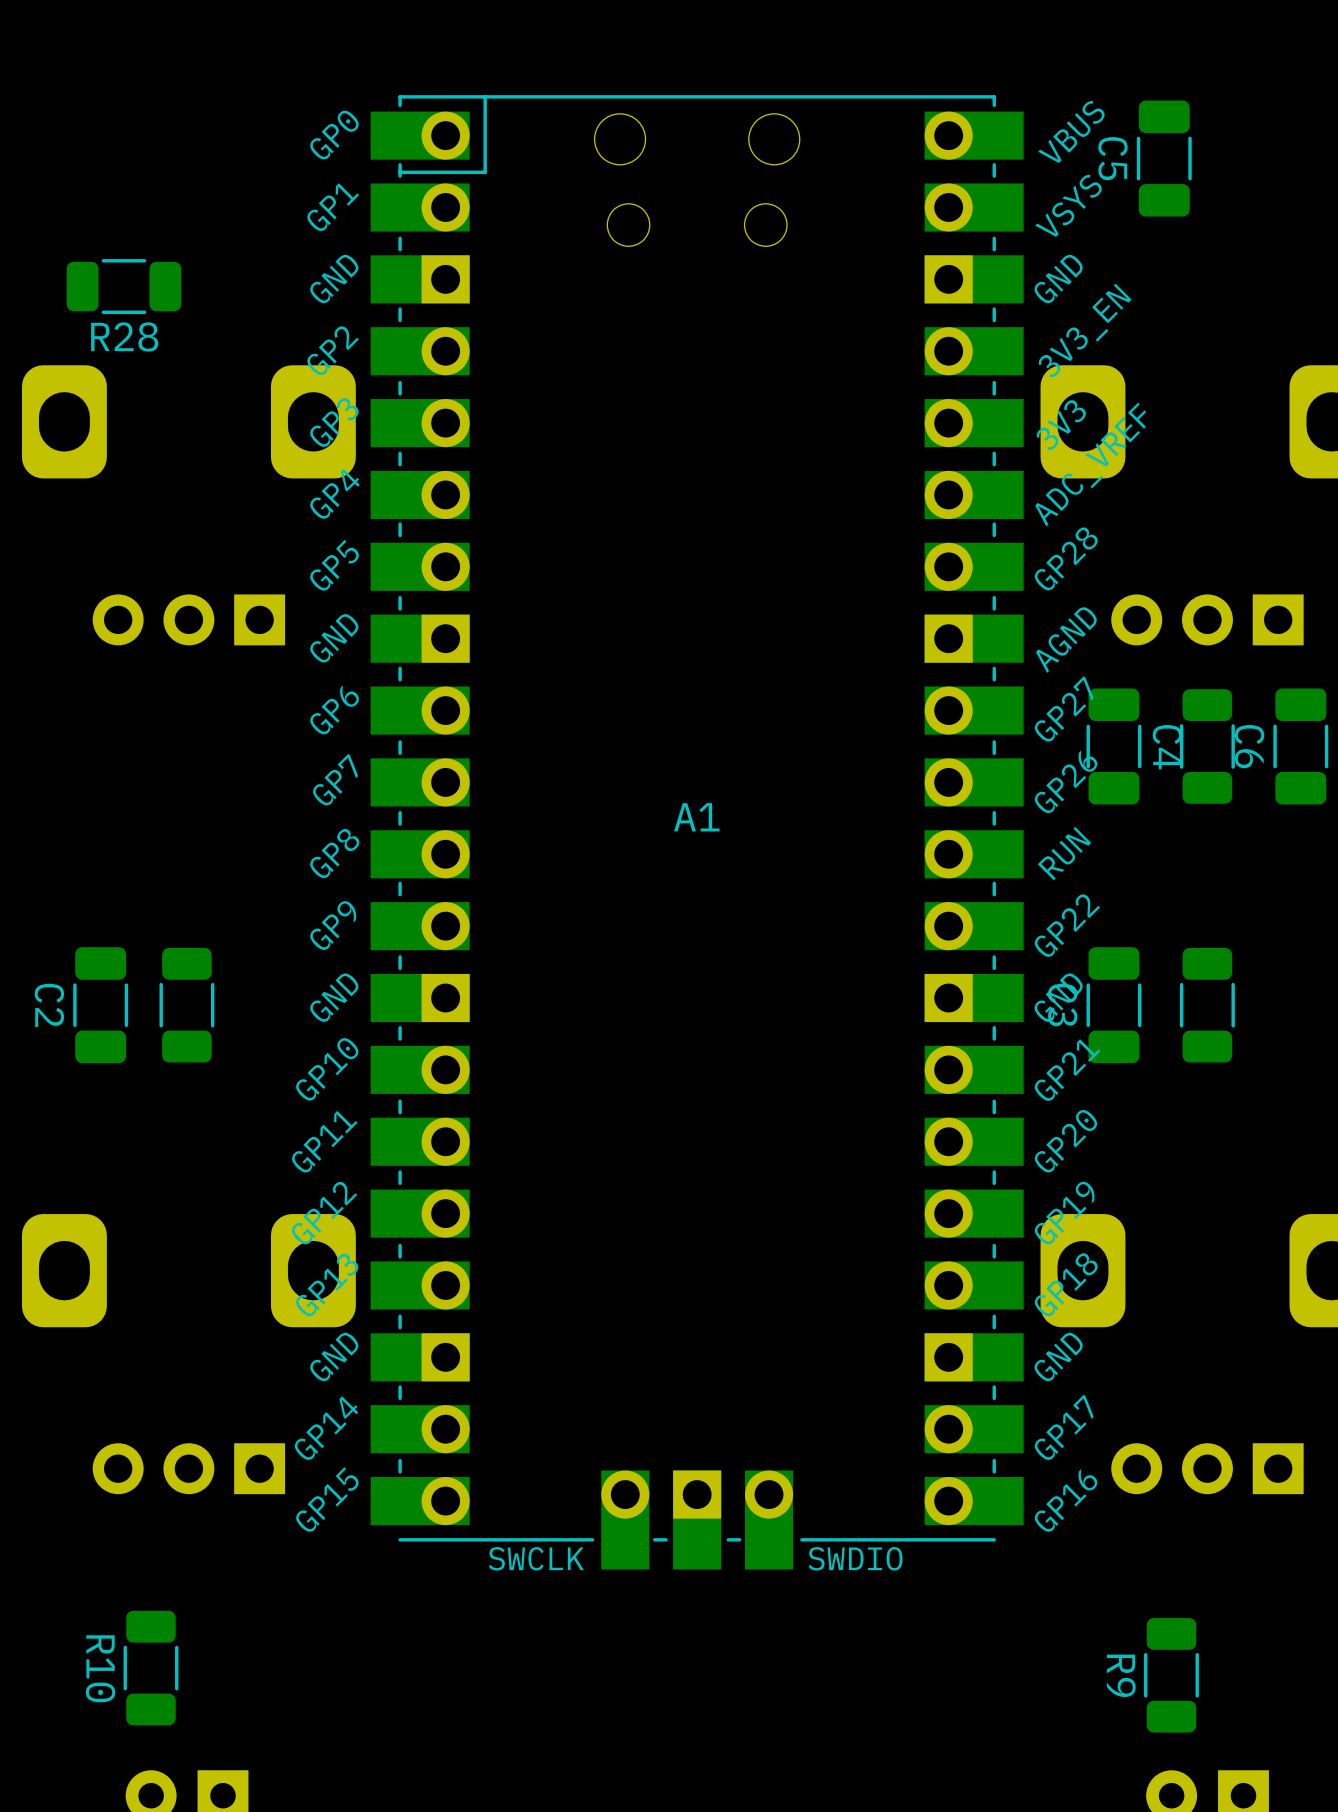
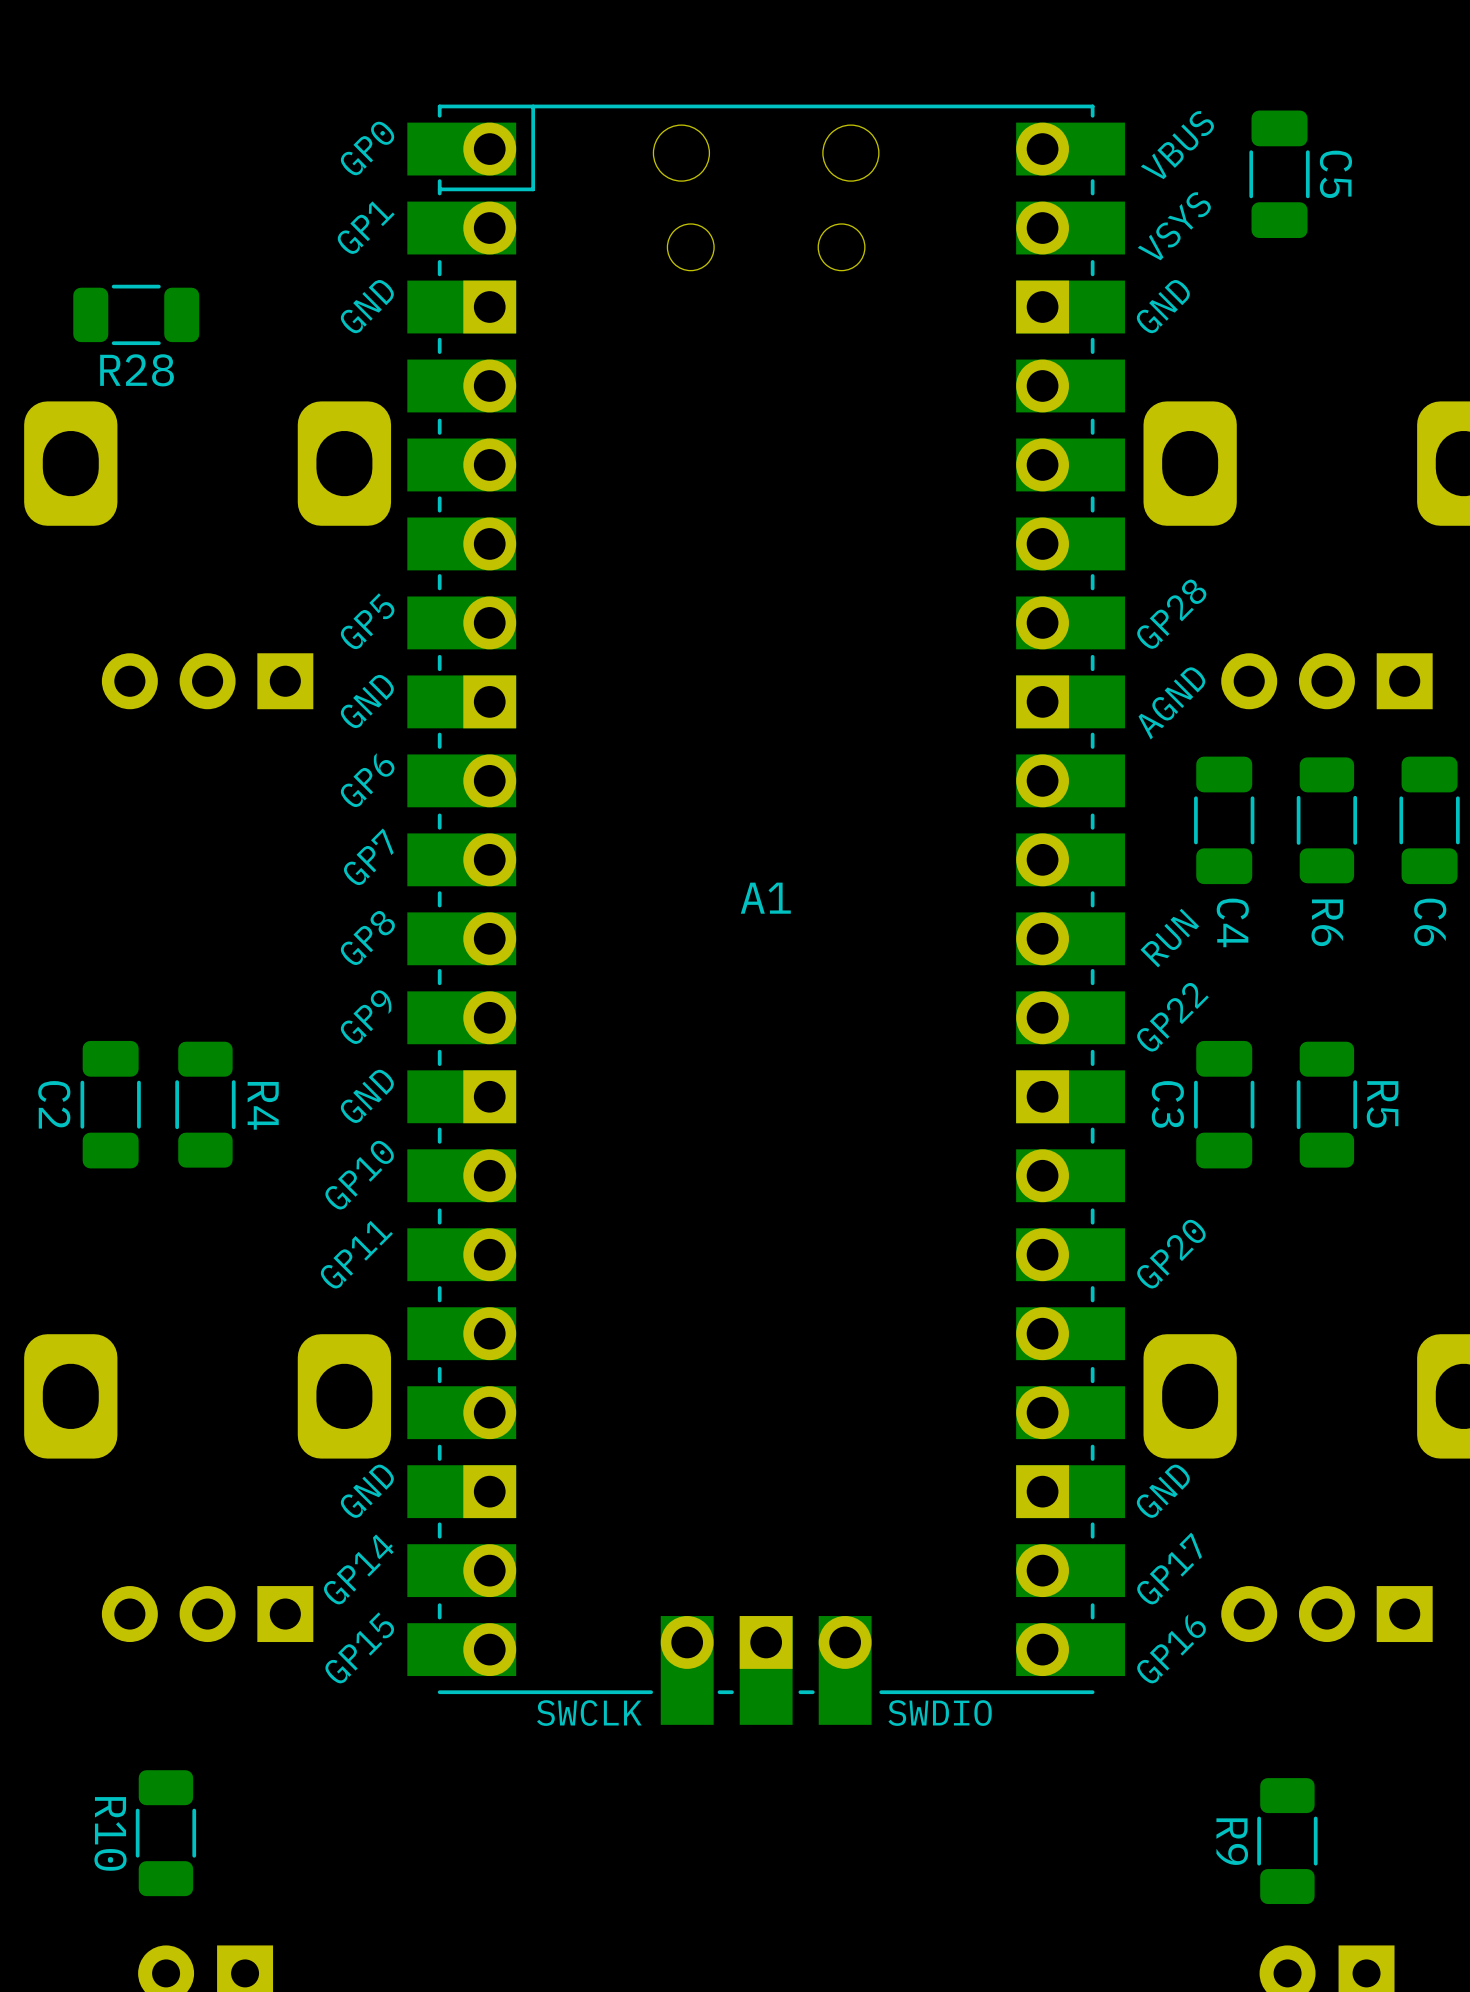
A1 footprint: [370, 95, 1024, 1570] -> [407, 104, 1125, 1725]
C5 name position: C5 (1113, 158) -> C5 (1335, 174)
C6 name position: C6 (1249, 746) -> C6 (1430, 922)
C4 name position: C4 (1167, 747) -> C4 (1232, 922)
R6 name: none -> R6 (1327, 922)
R5 name: none -> R5 (1382, 1104)
R4 name: none -> R4 (263, 1105)

